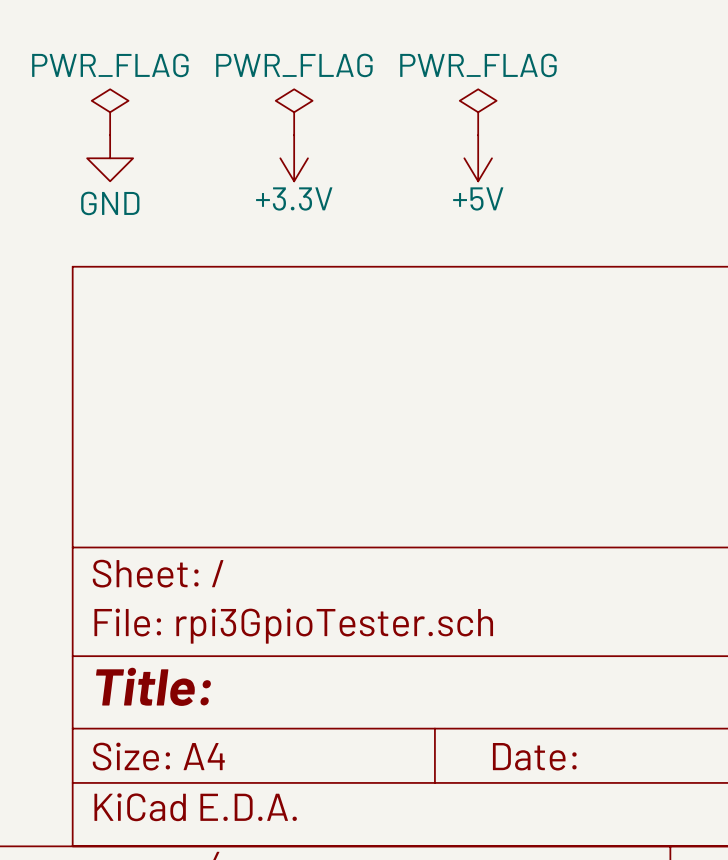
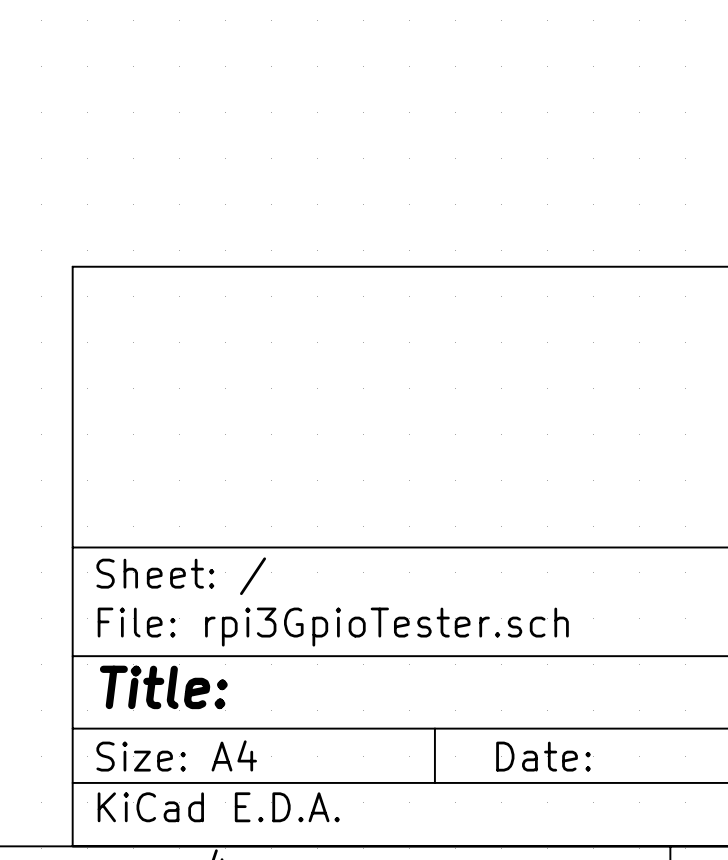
power symbol: PWR_FLAG (110, 112) -> none
power symbol: PWR_FLAG (294, 112) -> none
power symbol: PWR_FLAG (478, 112) -> none
power symbol: GND (110, 158) -> none
power symbol: +3.3V (294, 158) -> none
power symbol: +5V (478, 158) -> none

